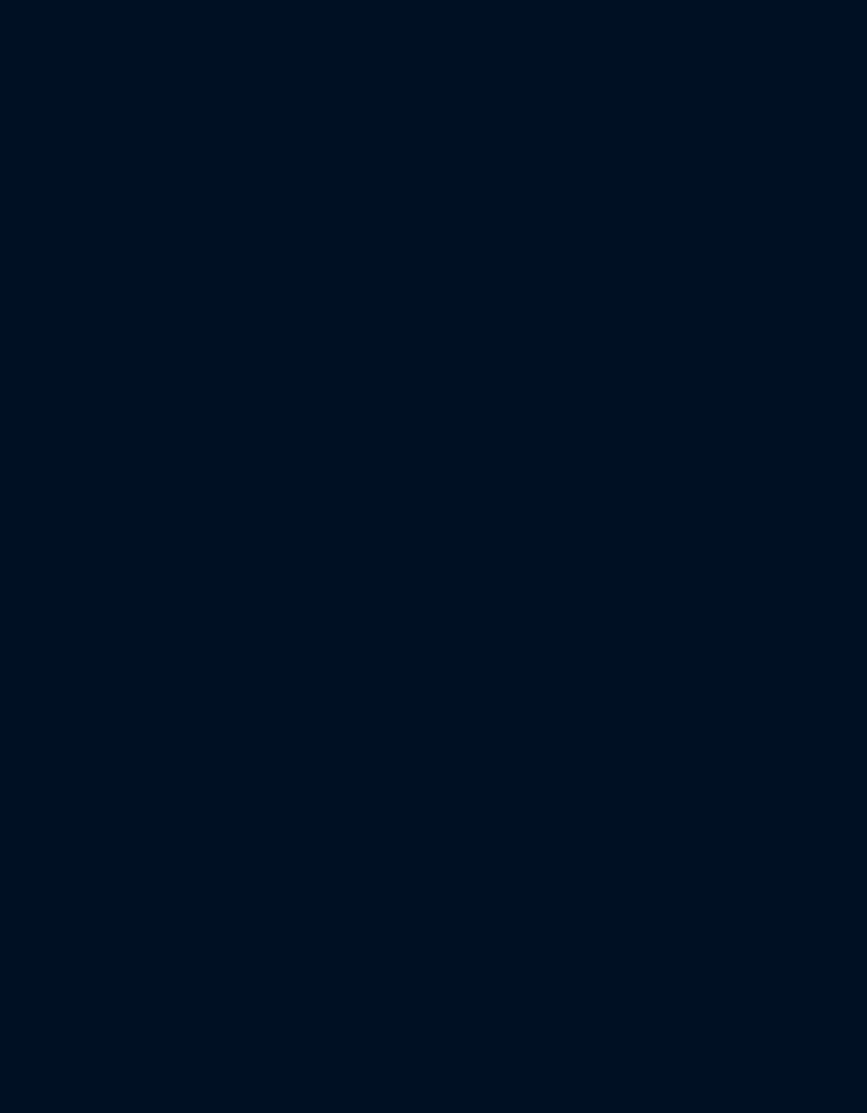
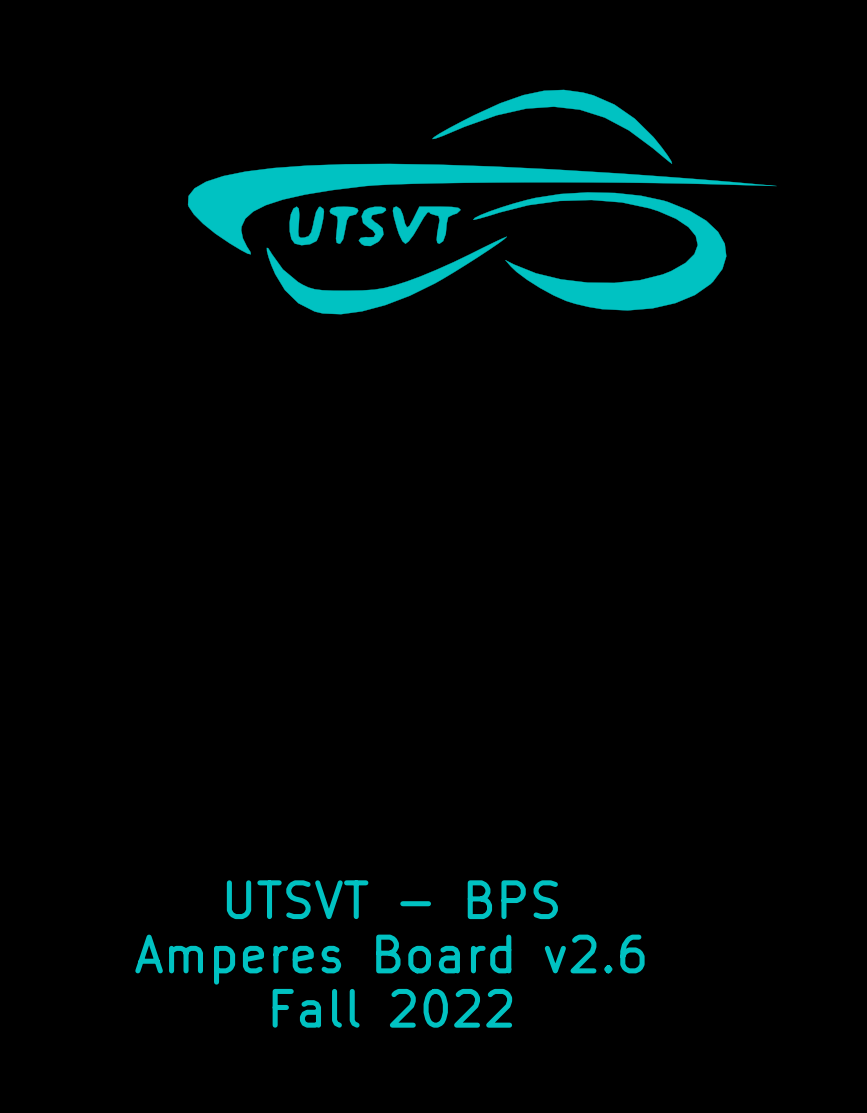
drawing: none -> [187, 89, 777, 315]
text: none -> UTSVT - BPS (392, 899)
text: none -> Amperes Board v2.6 (389, 959)
text: none -> Fall 2022 (392, 1008)

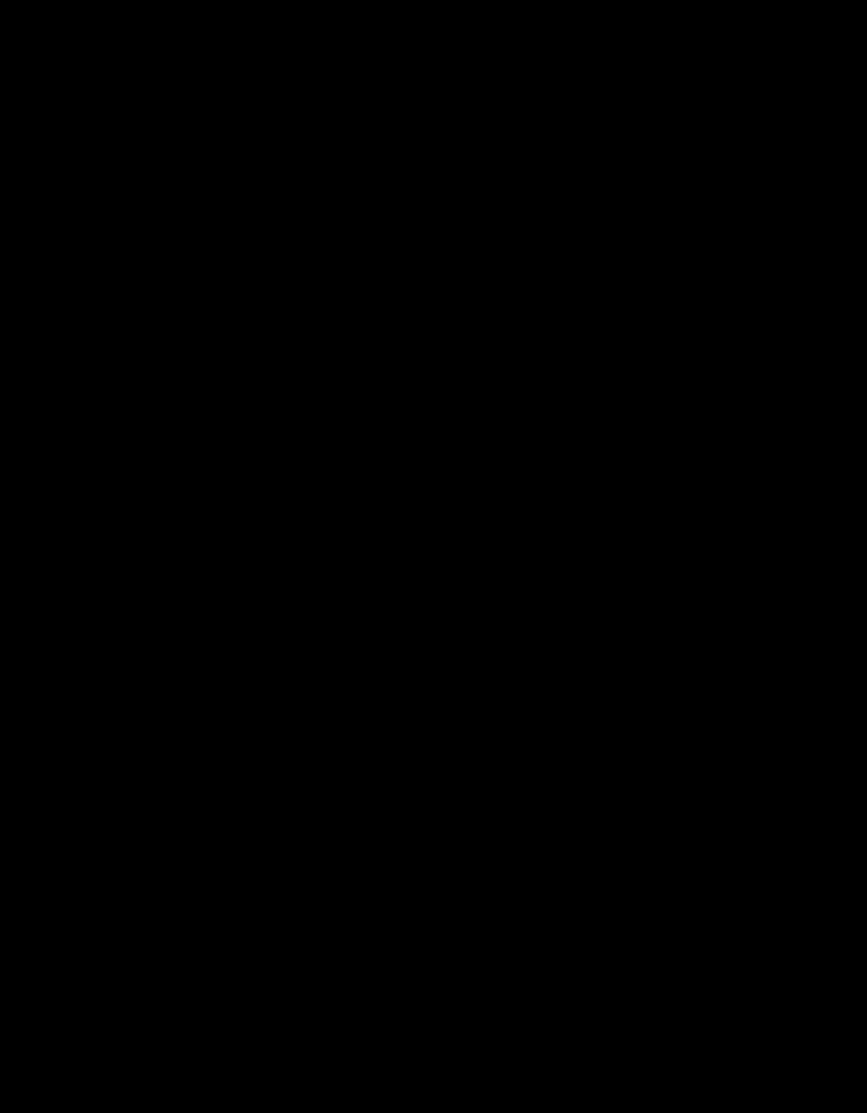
drawing: [187, 89, 777, 315] -> none
text: UTSVT - BPS (392, 899) -> none
text: Amperes Board v2.6 (389, 959) -> none
text: Fall 2022 (392, 1008) -> none

